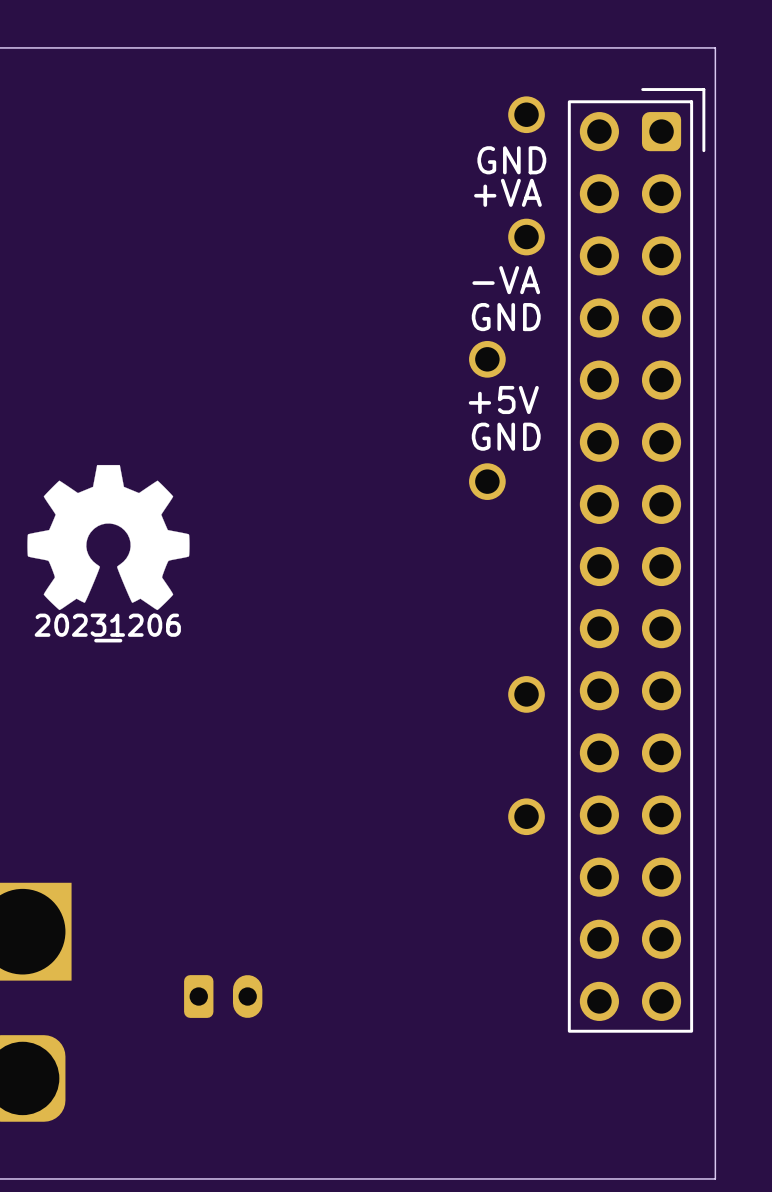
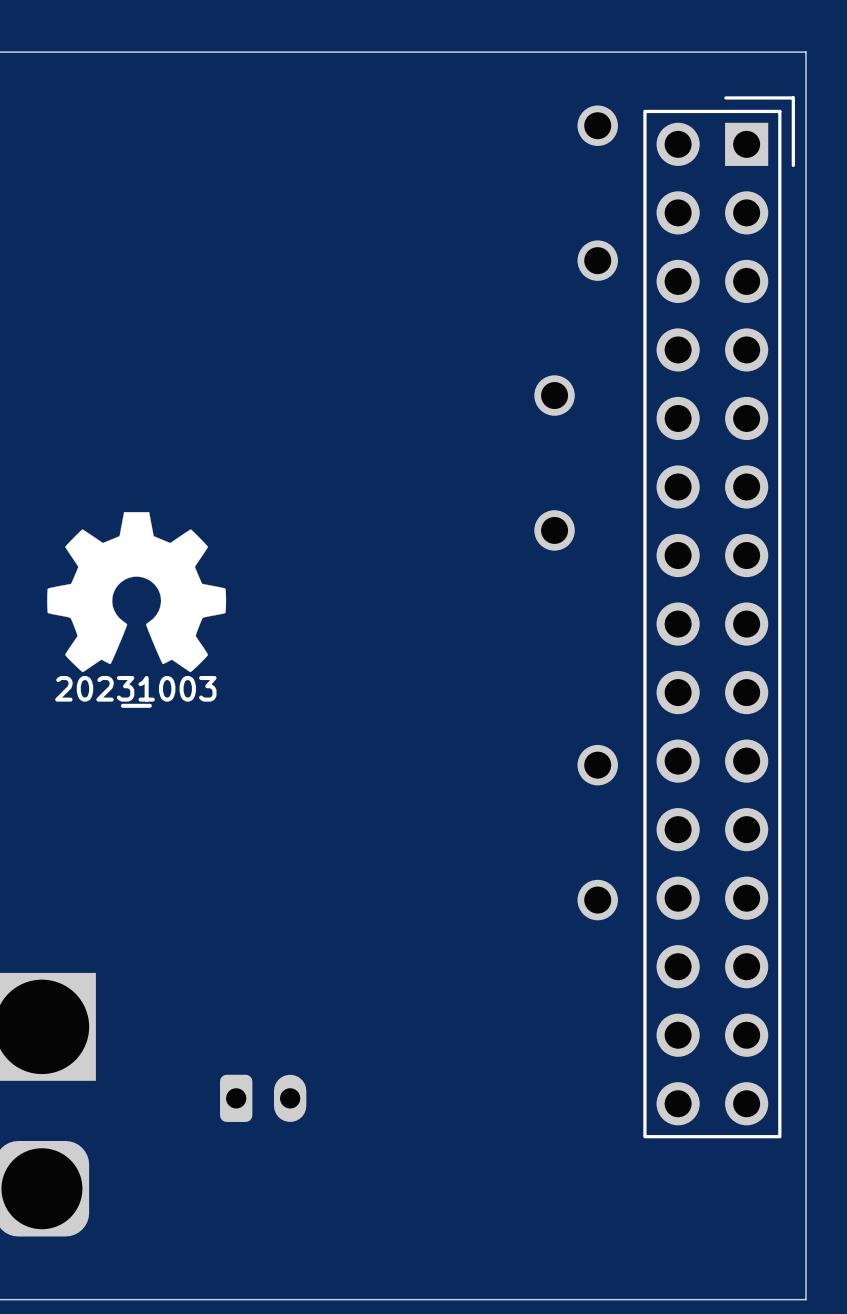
part footprint: [567, 88, 706, 1033] -> [643, 96, 795, 1139]
drawing shape: [34, 613, 181, 643] -> [55, 675, 217, 708]

